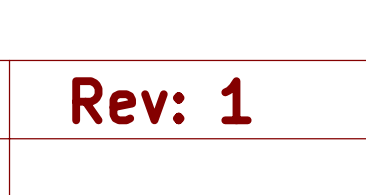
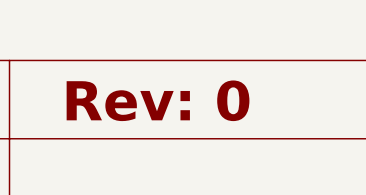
title block: Rev: 1 (161, 100) -> Rev: 0 (158, 100)

